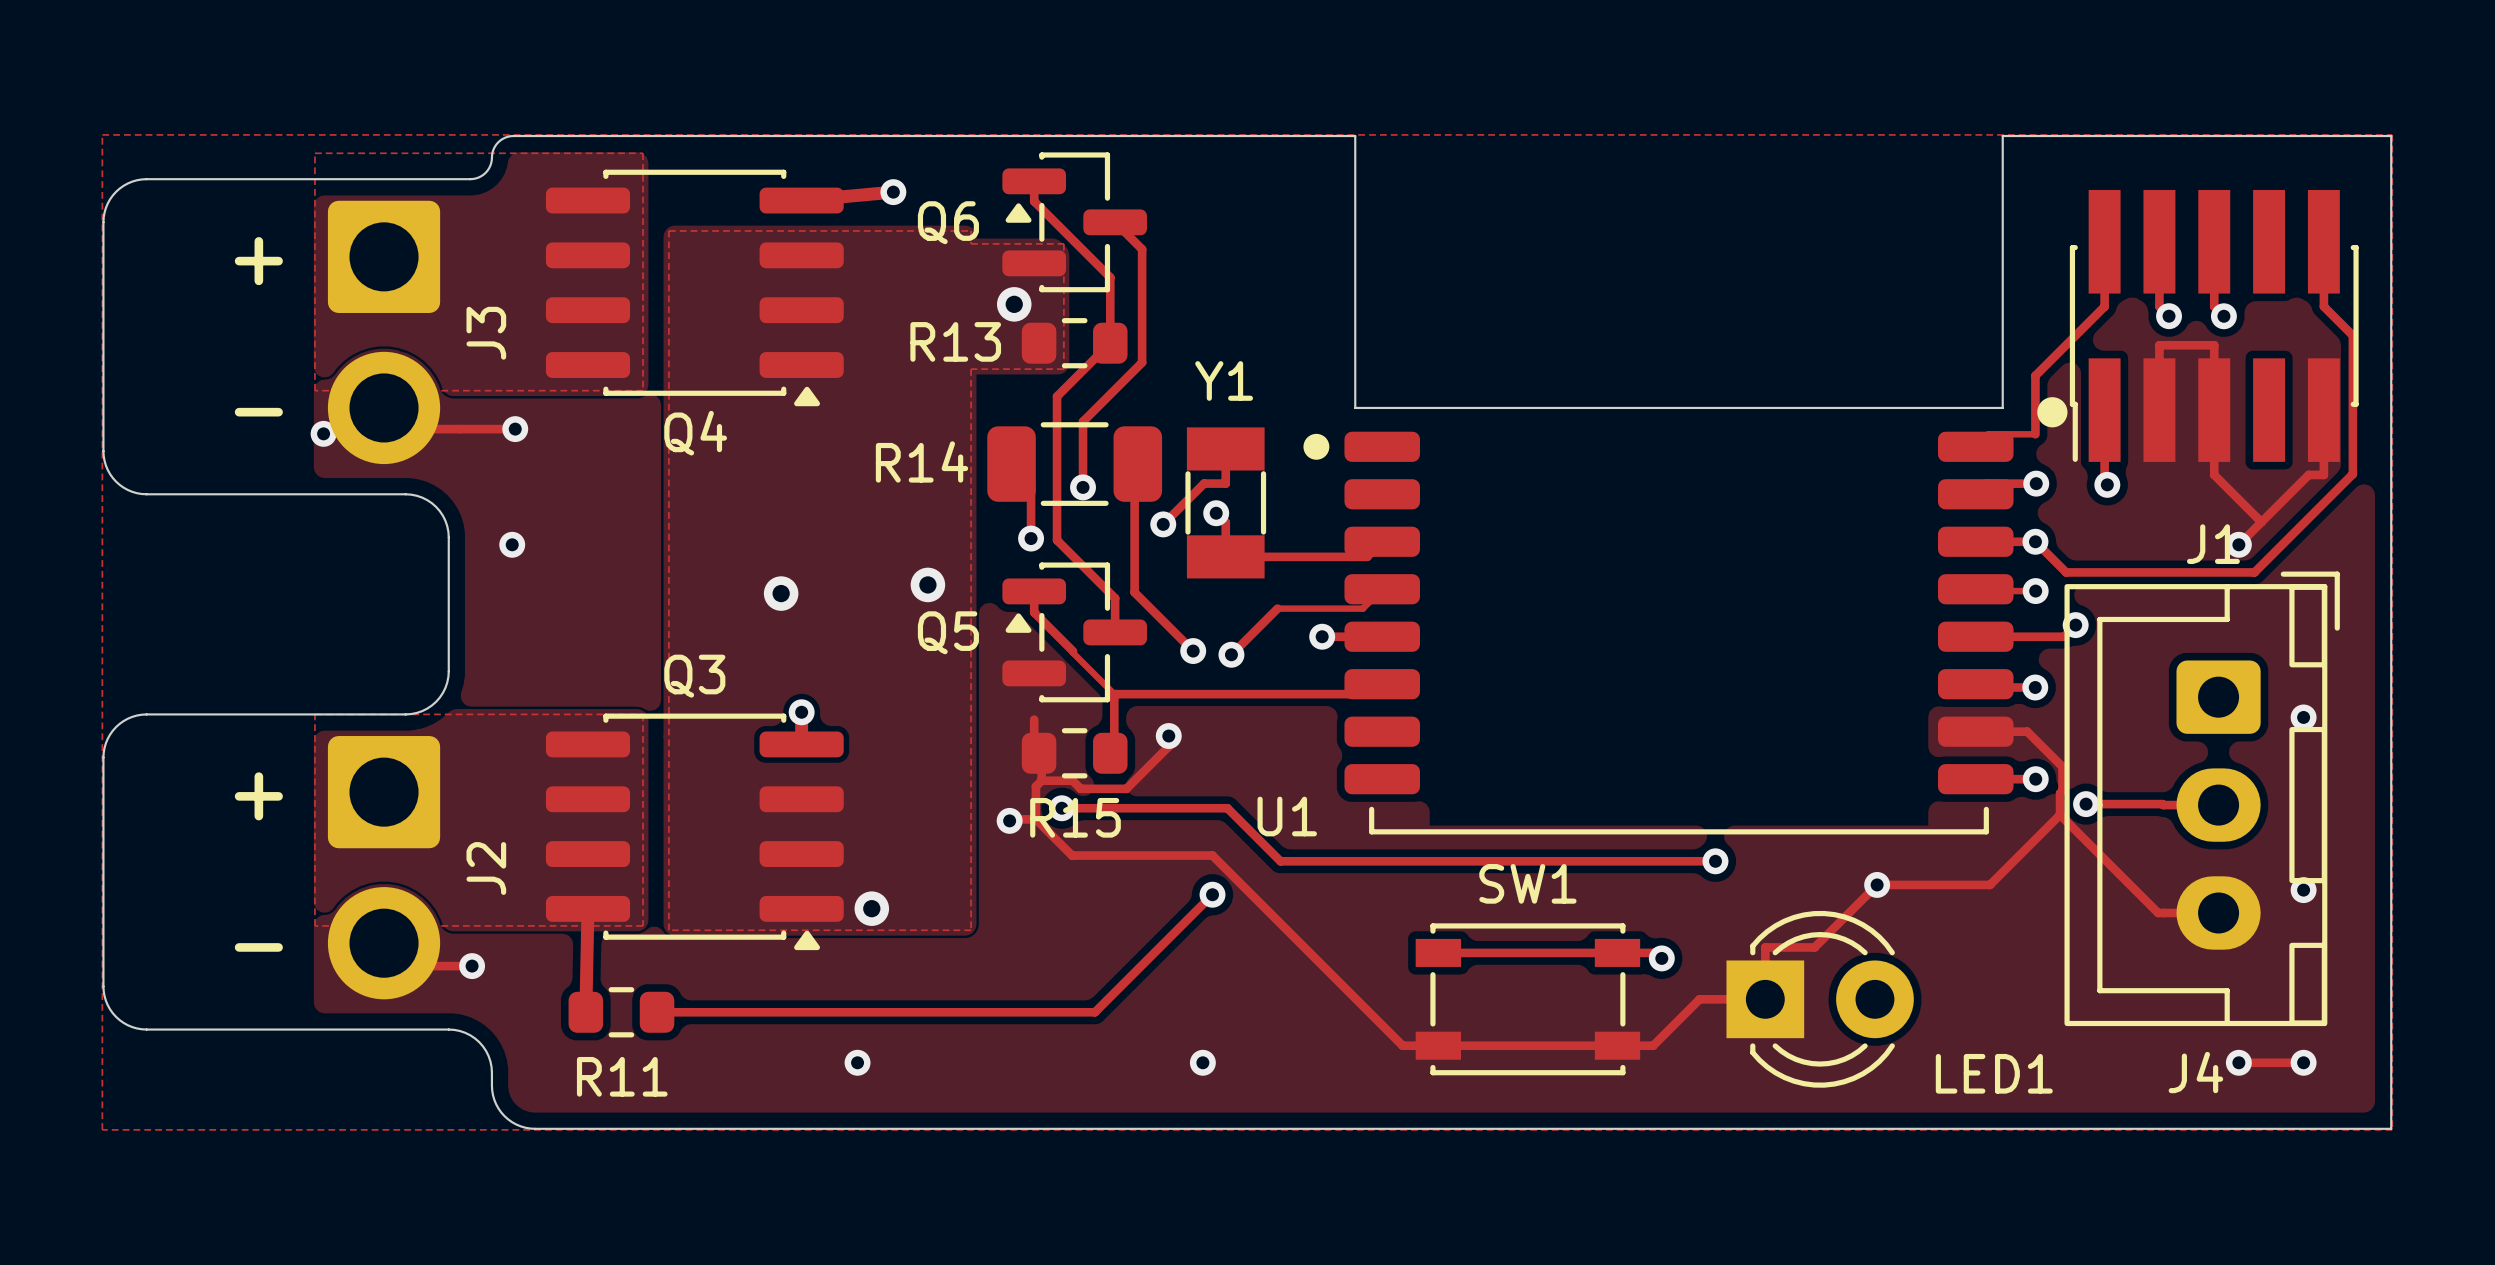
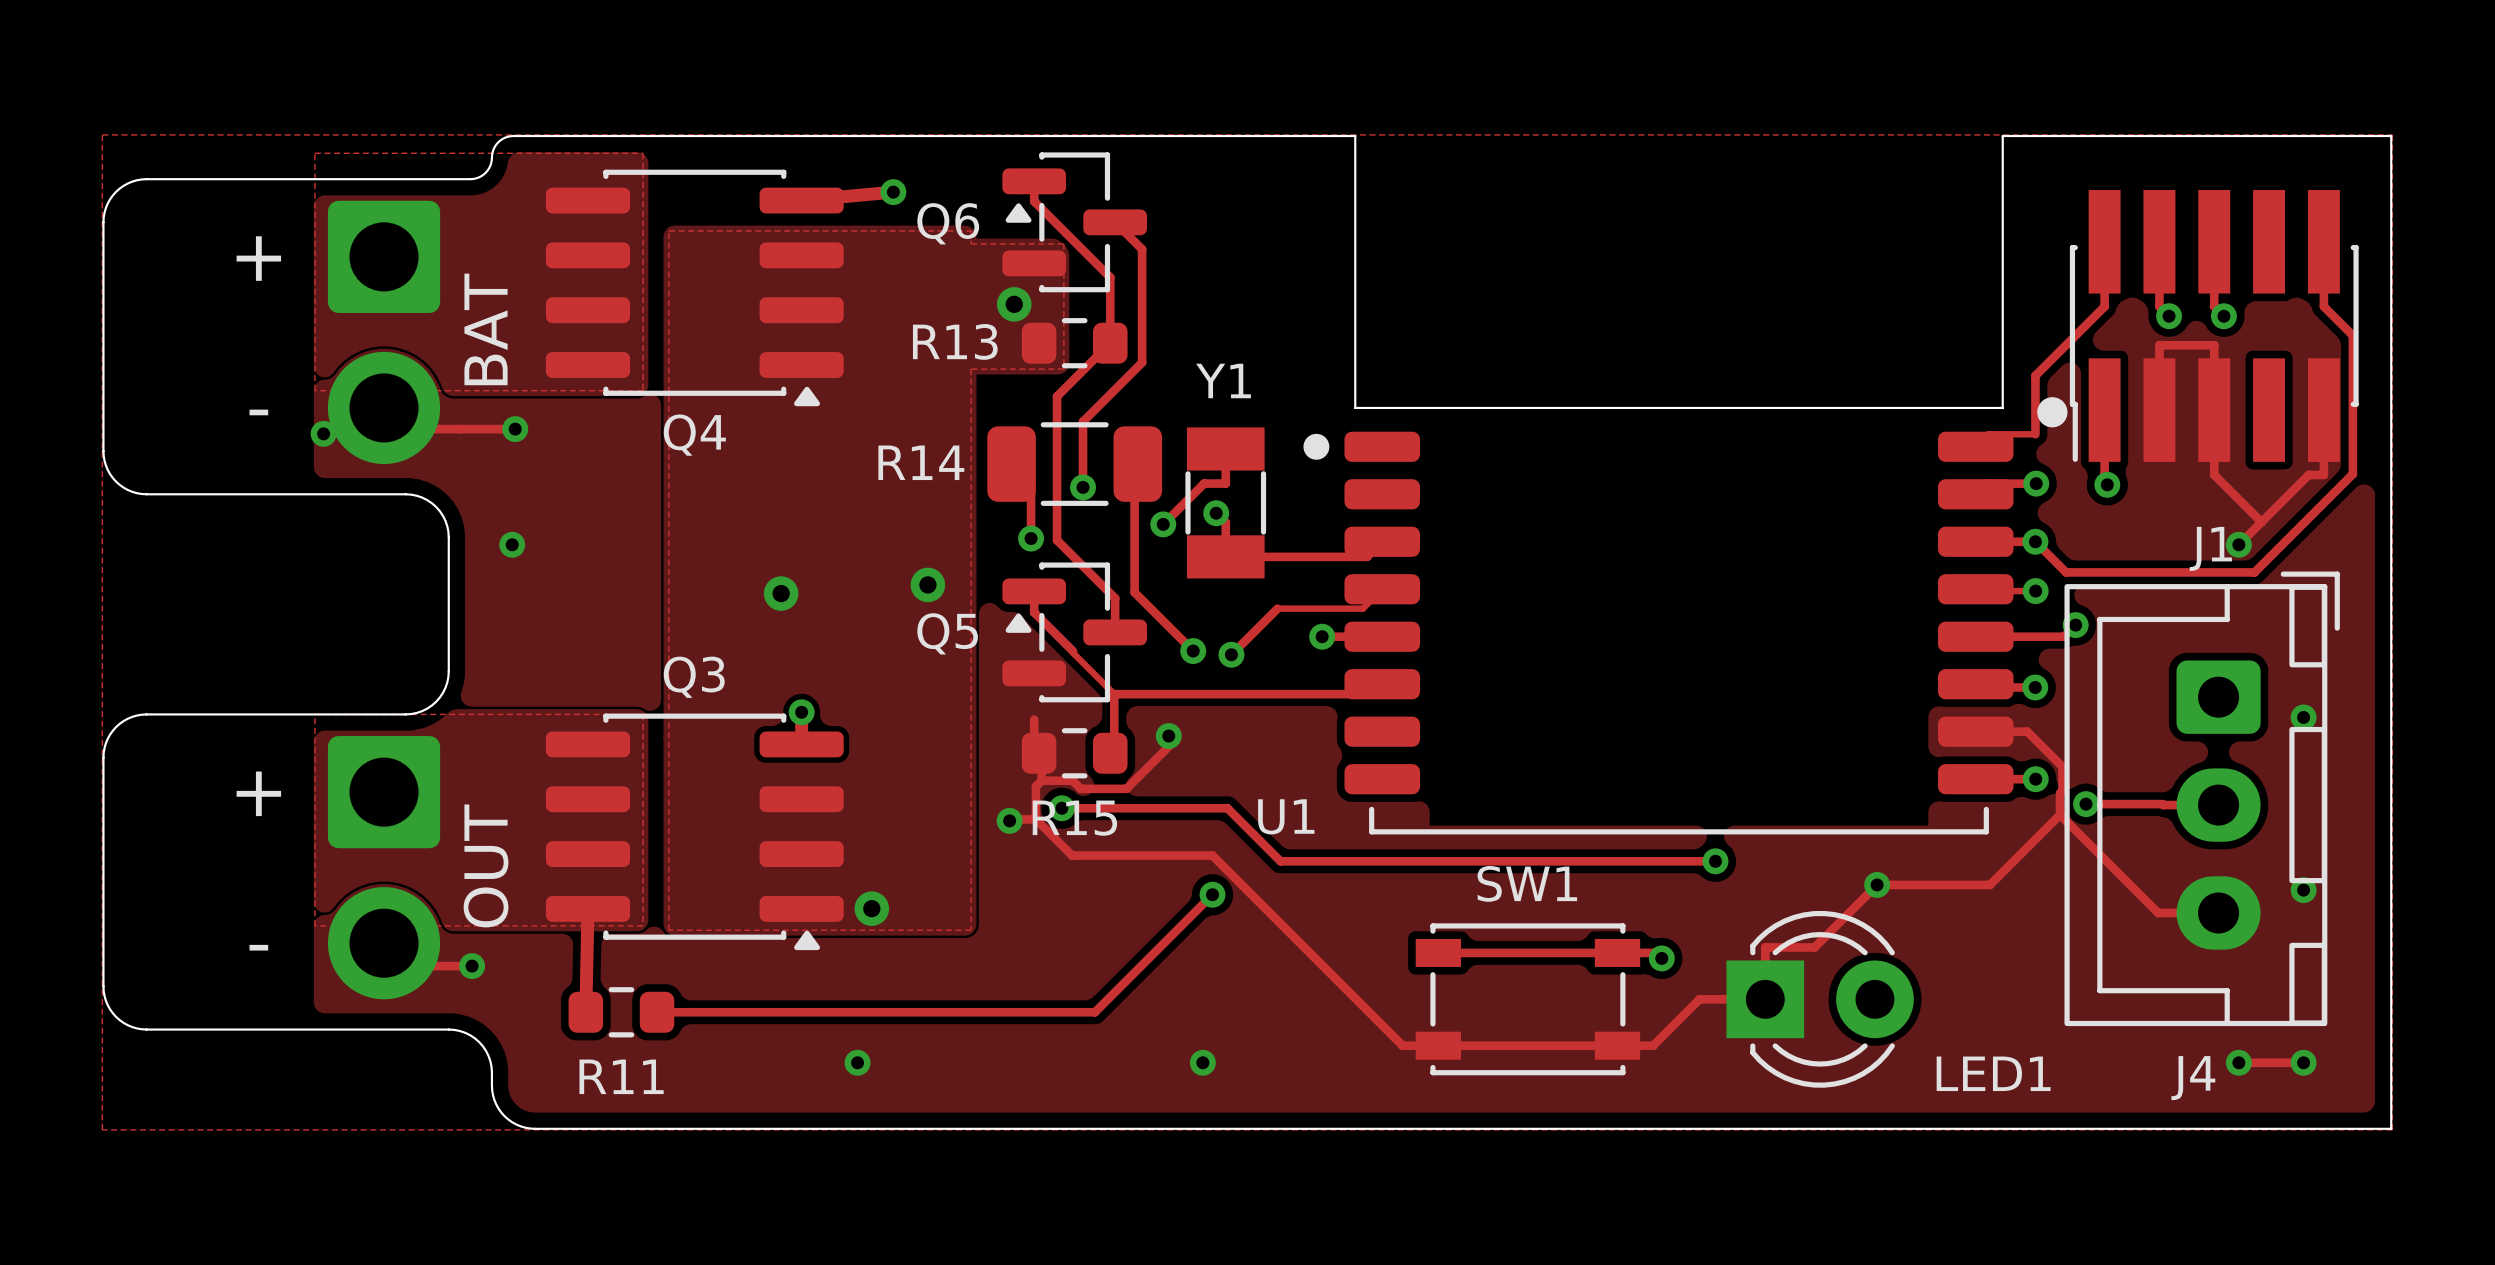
text: none -> BAT (486, 329)
J3 name: J3 (486, 333) -> none
text: none -> OUT (486, 865)
J2 name: J2 (486, 868) -> none

